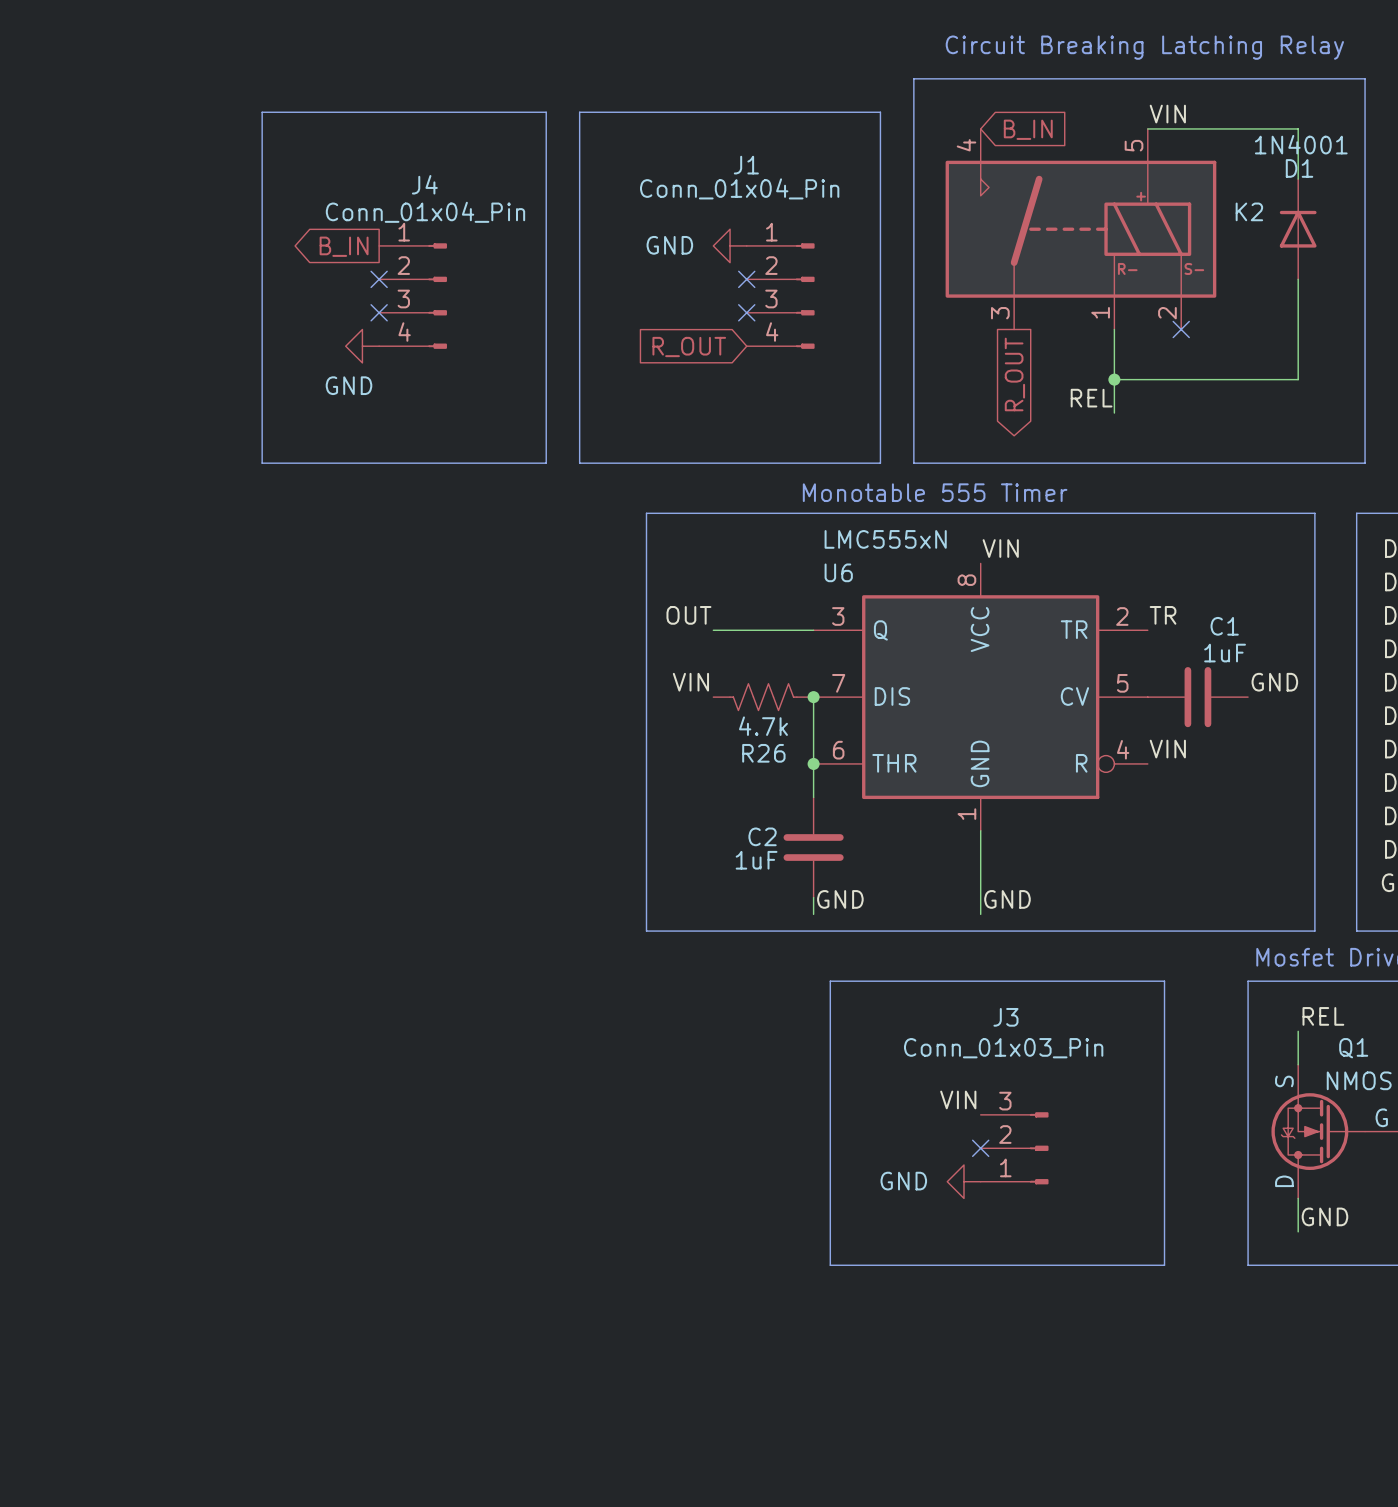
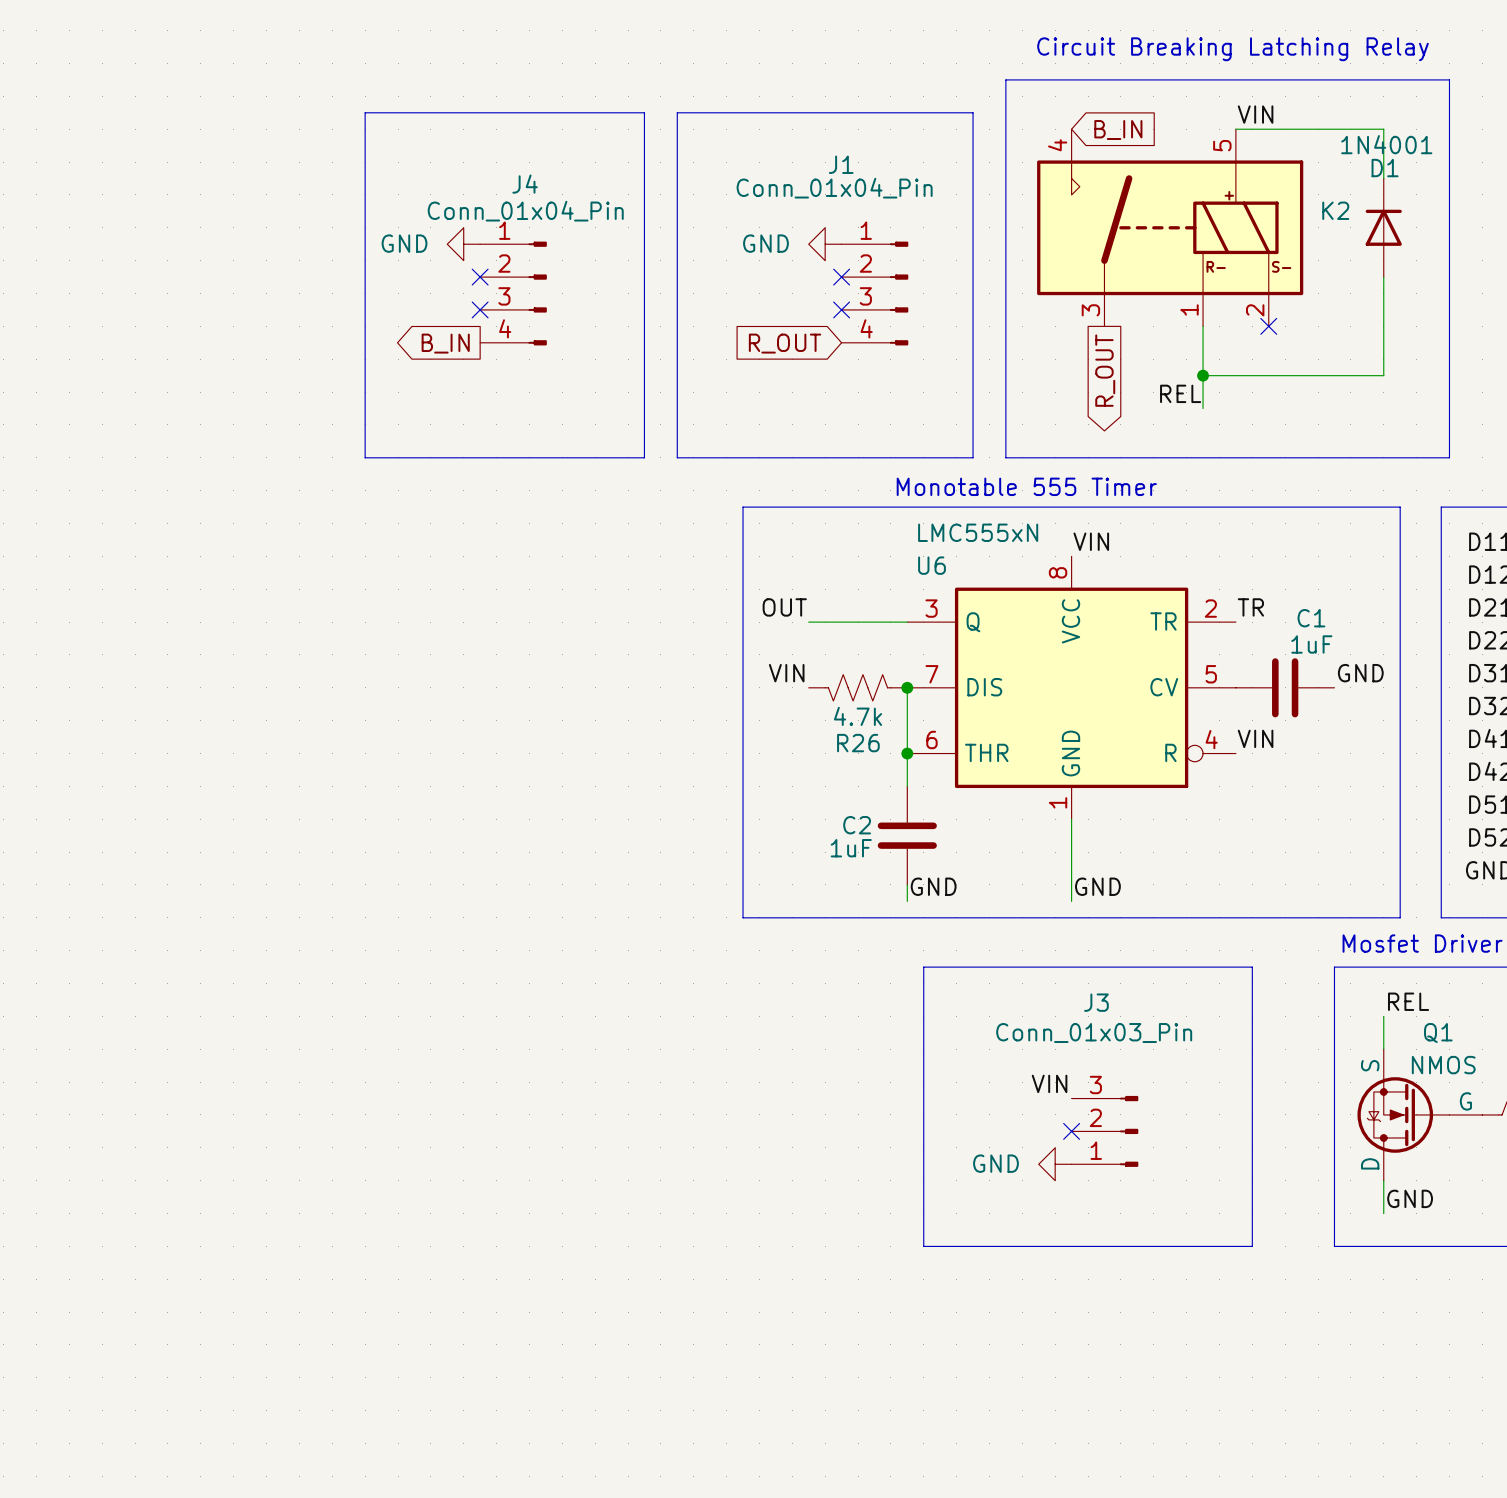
global label position: B_IN (344, 246) -> B_IN (445, 343)
power symbol position: GND (362, 346) -> GND (463, 244)
power symbol text position: GND (349, 385) -> GND (404, 243)

